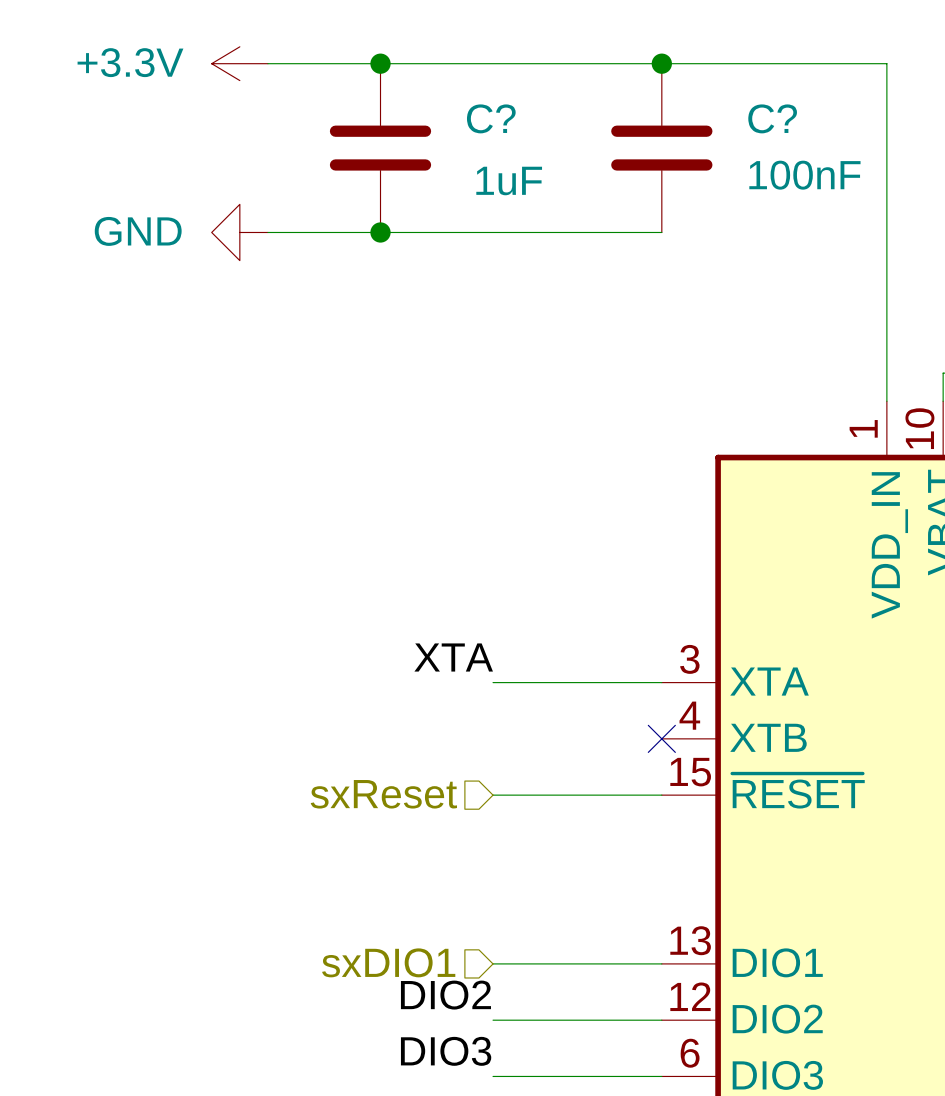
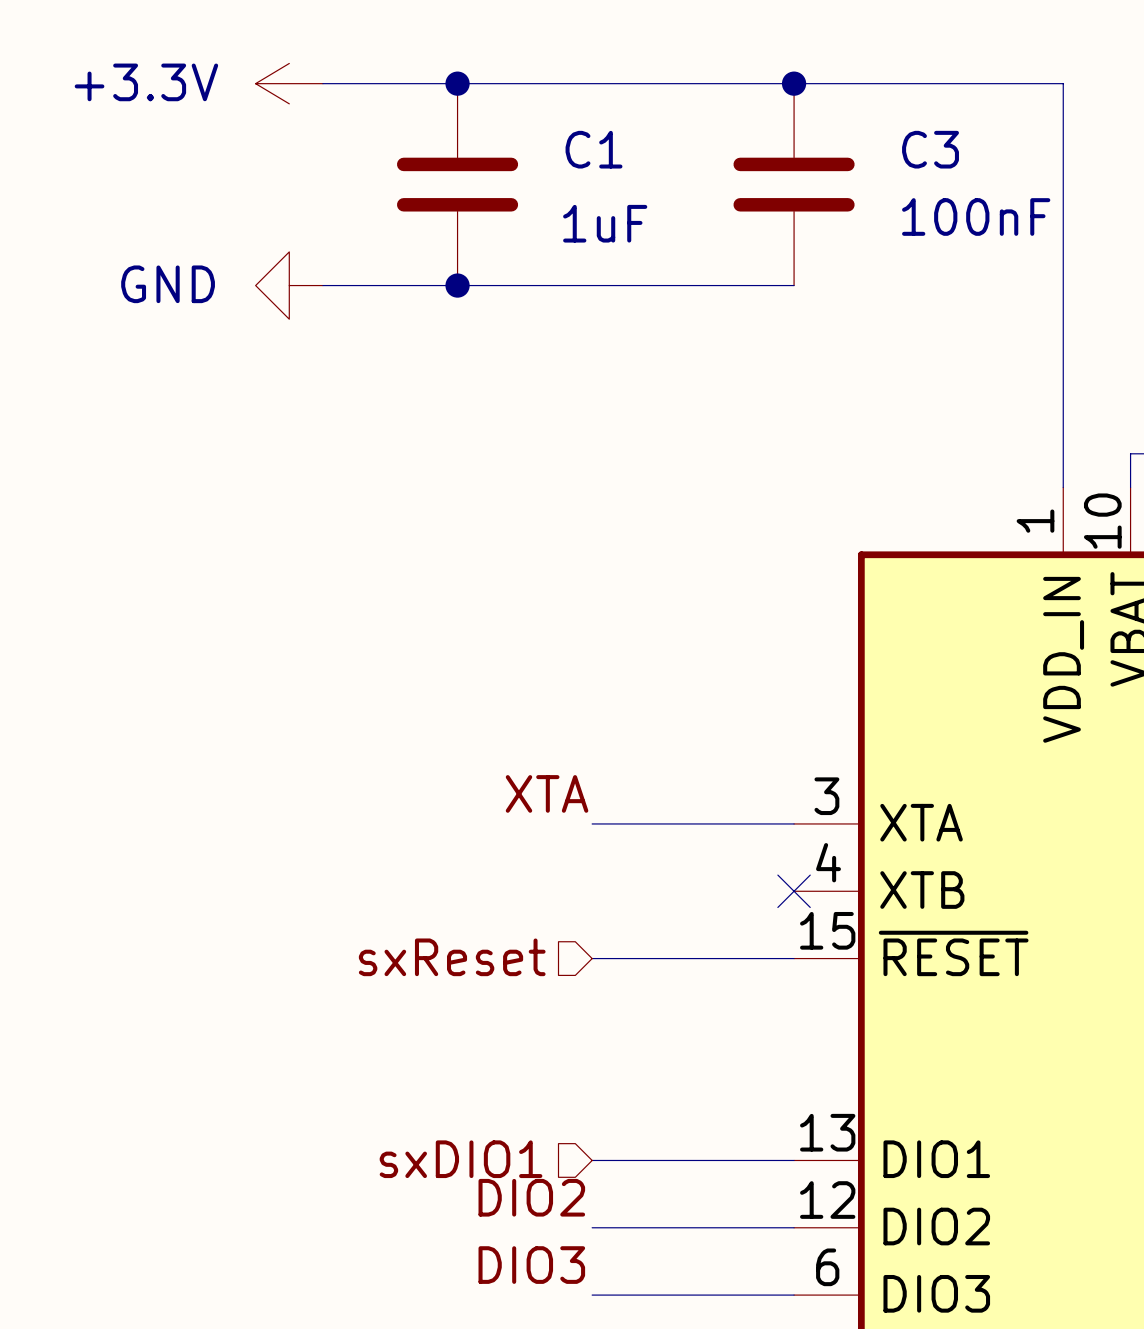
C? name: C? (491, 118) -> C1 (594, 149)
C? name: C? (772, 118) -> C3 (930, 149)

